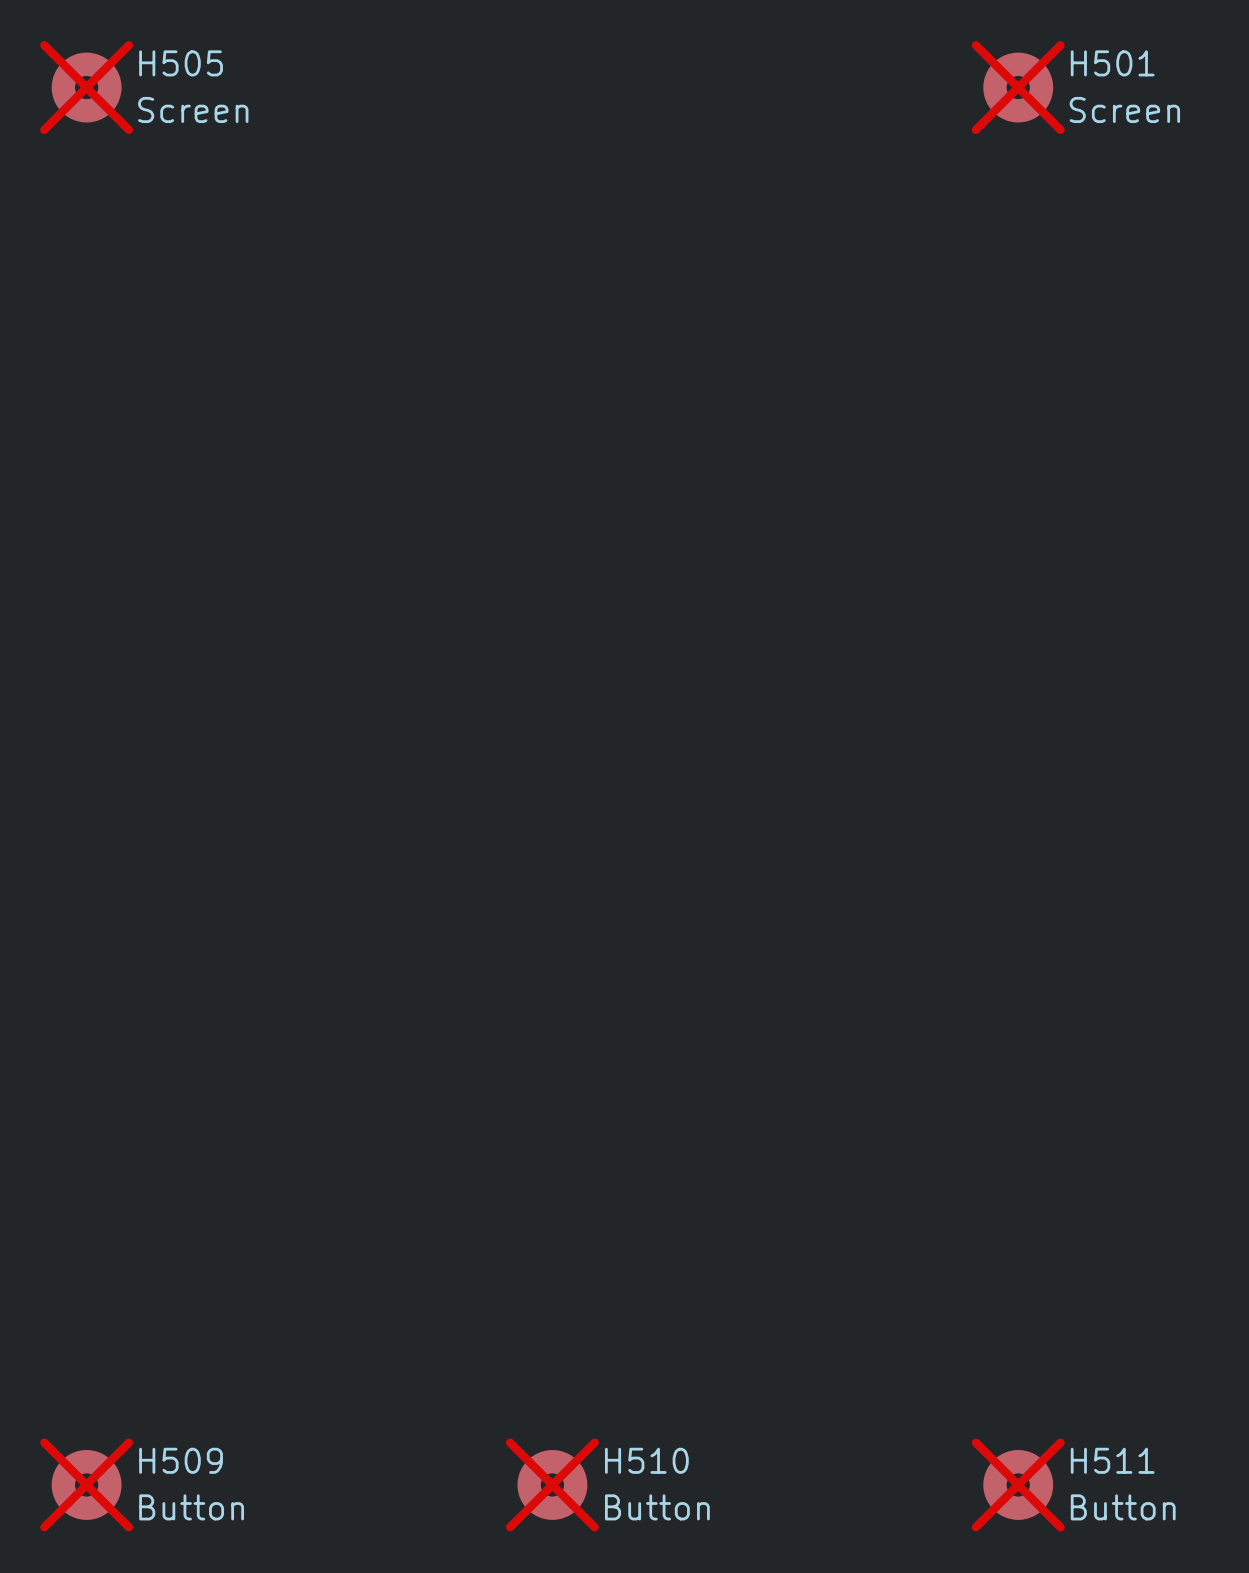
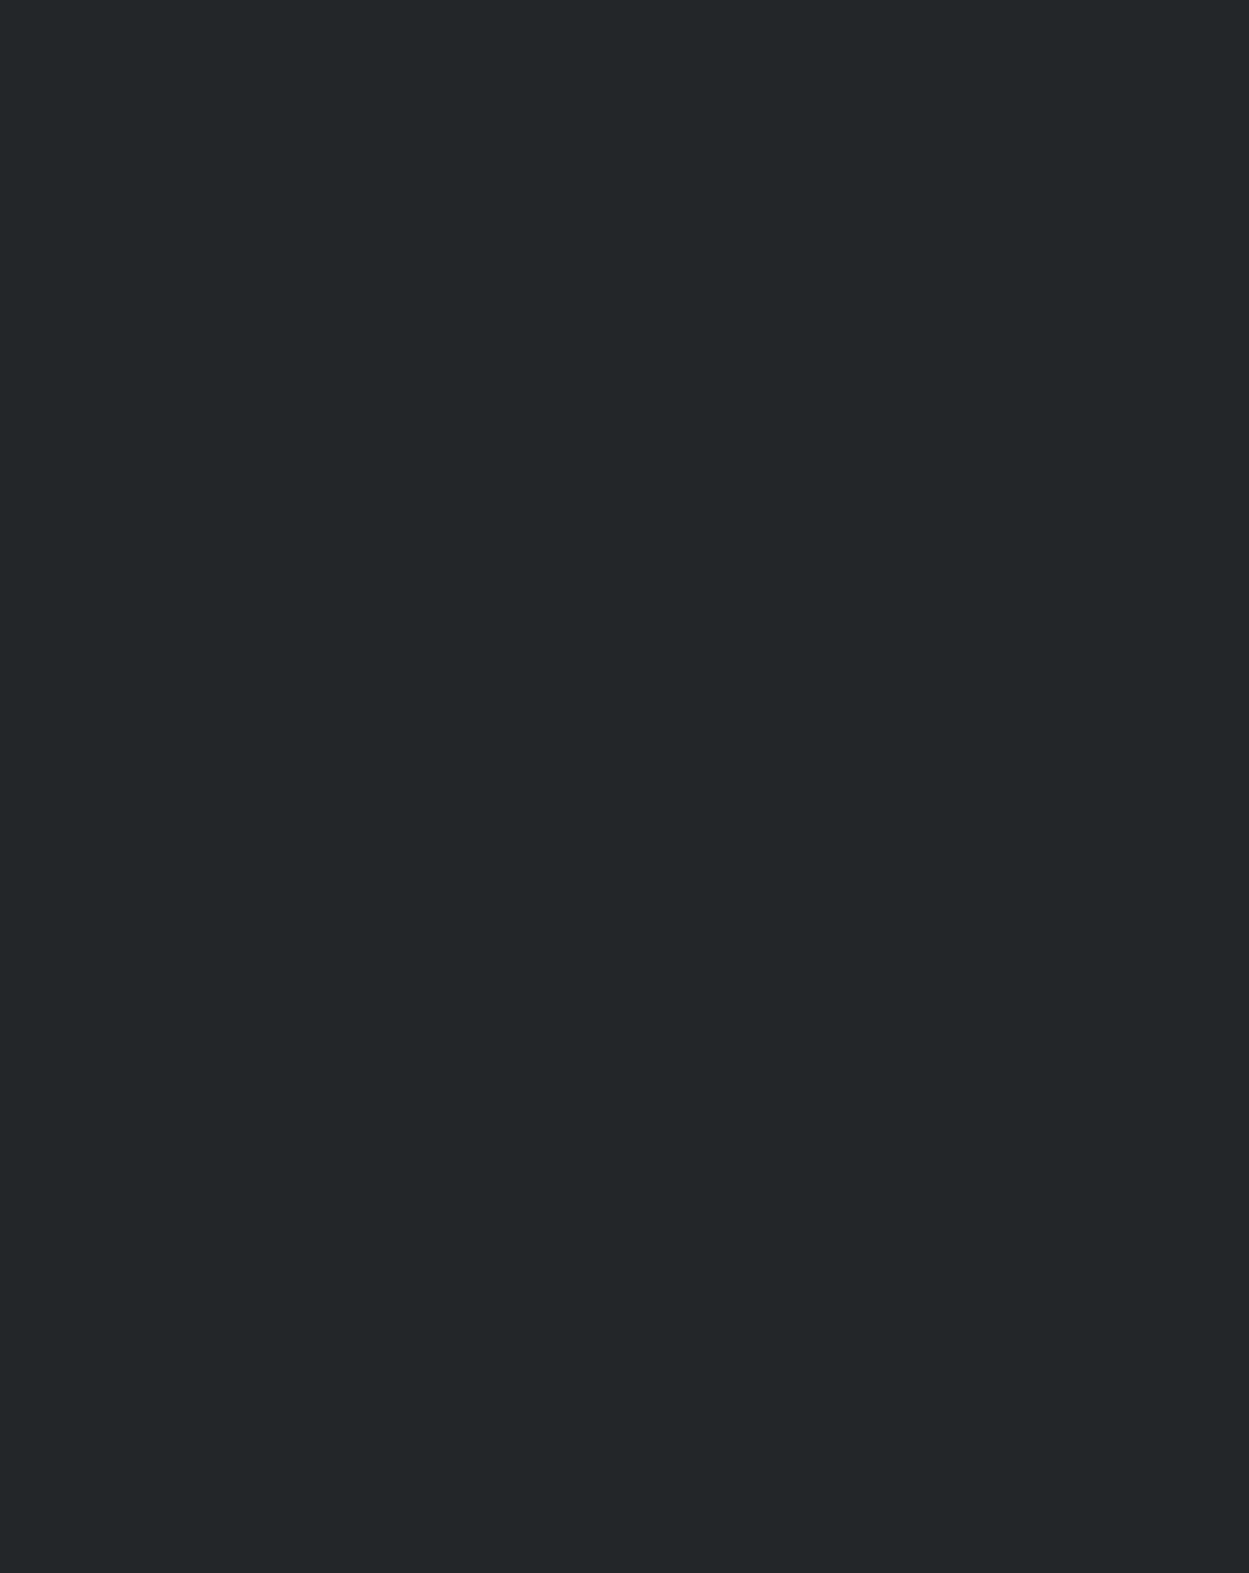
H505: Screen (86, 87) -> none
H501: Screen (1018, 87) -> none
H509: Button (86, 1484) -> none
H510: Button (552, 1484) -> none
H511: Button (1018, 1484) -> none

